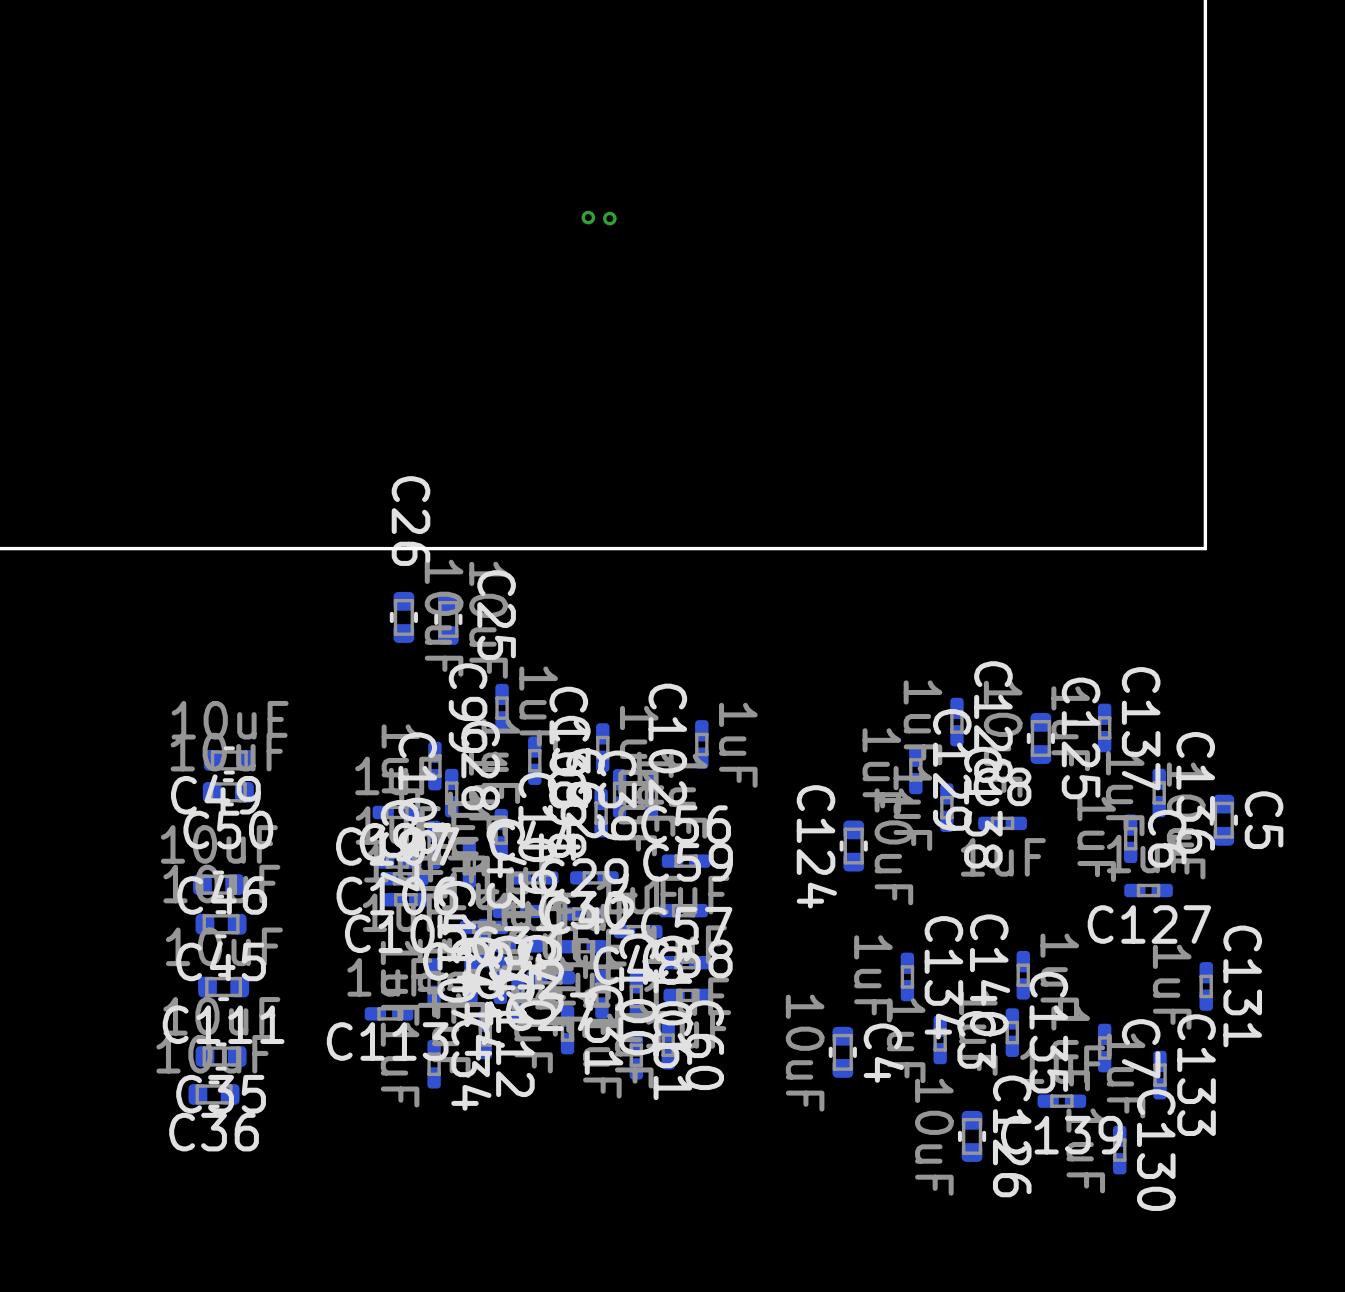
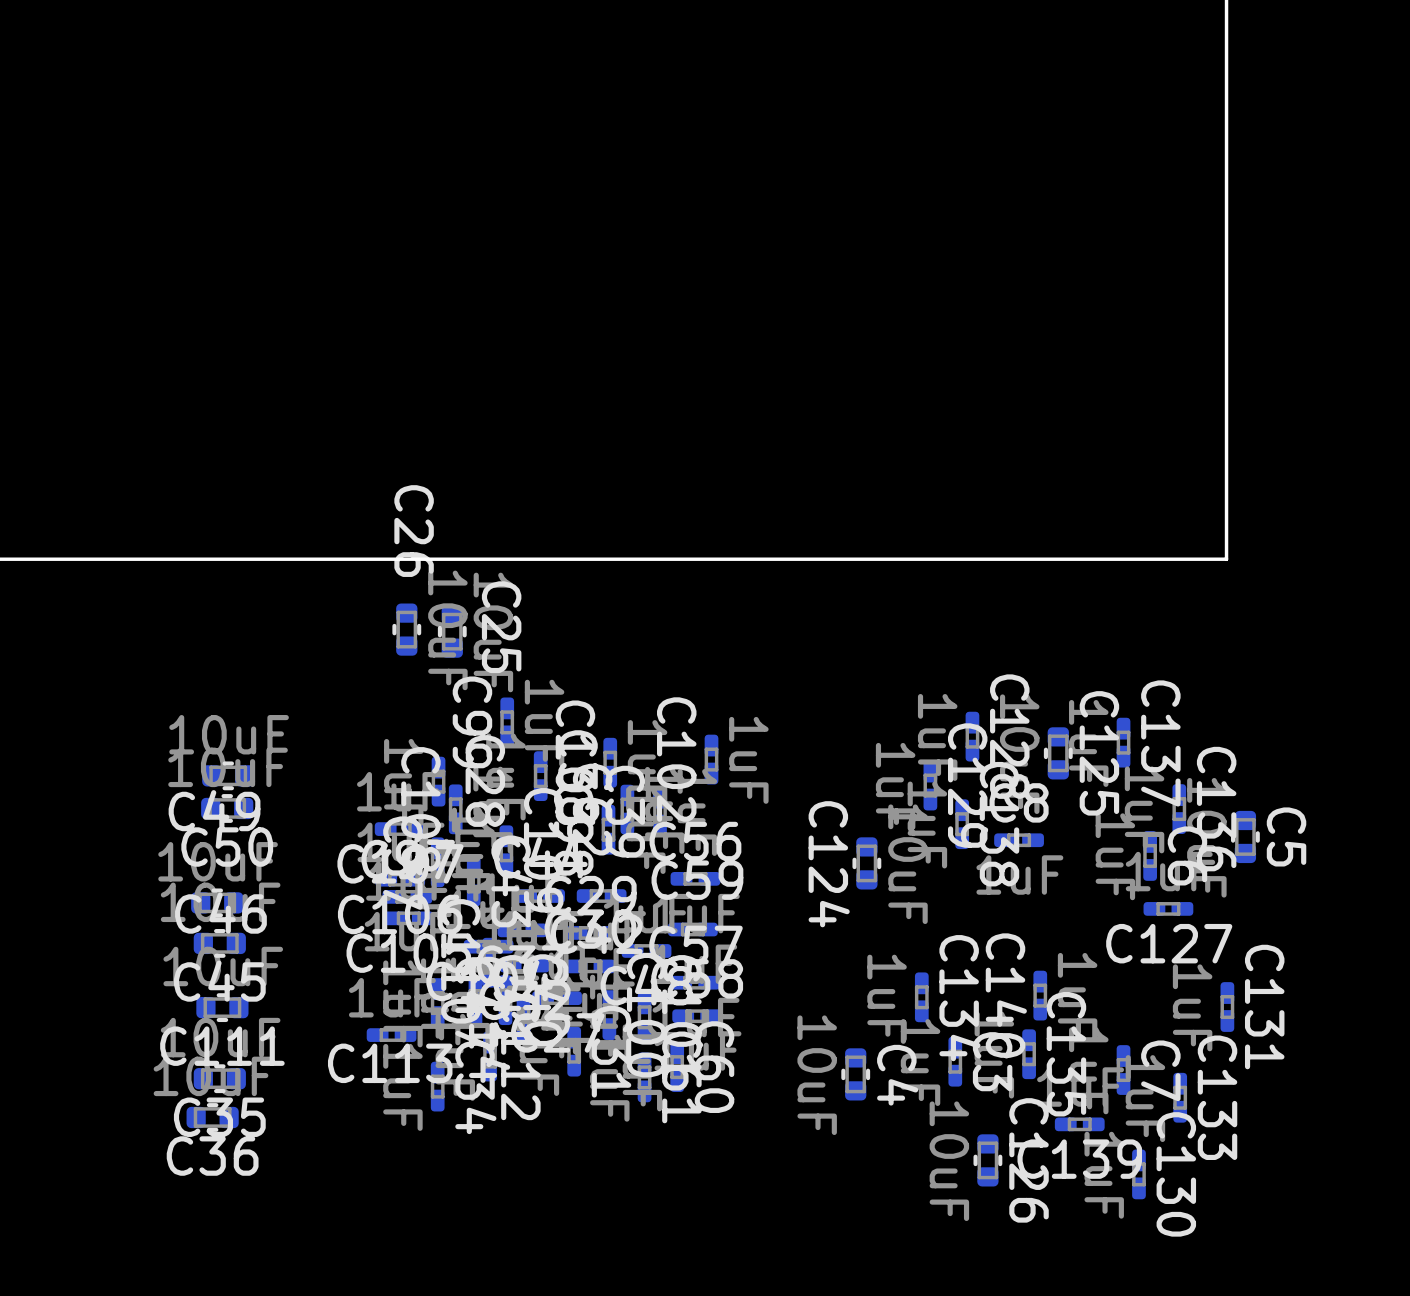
via: (588, 217) -> none
via: (609, 218) -> none

